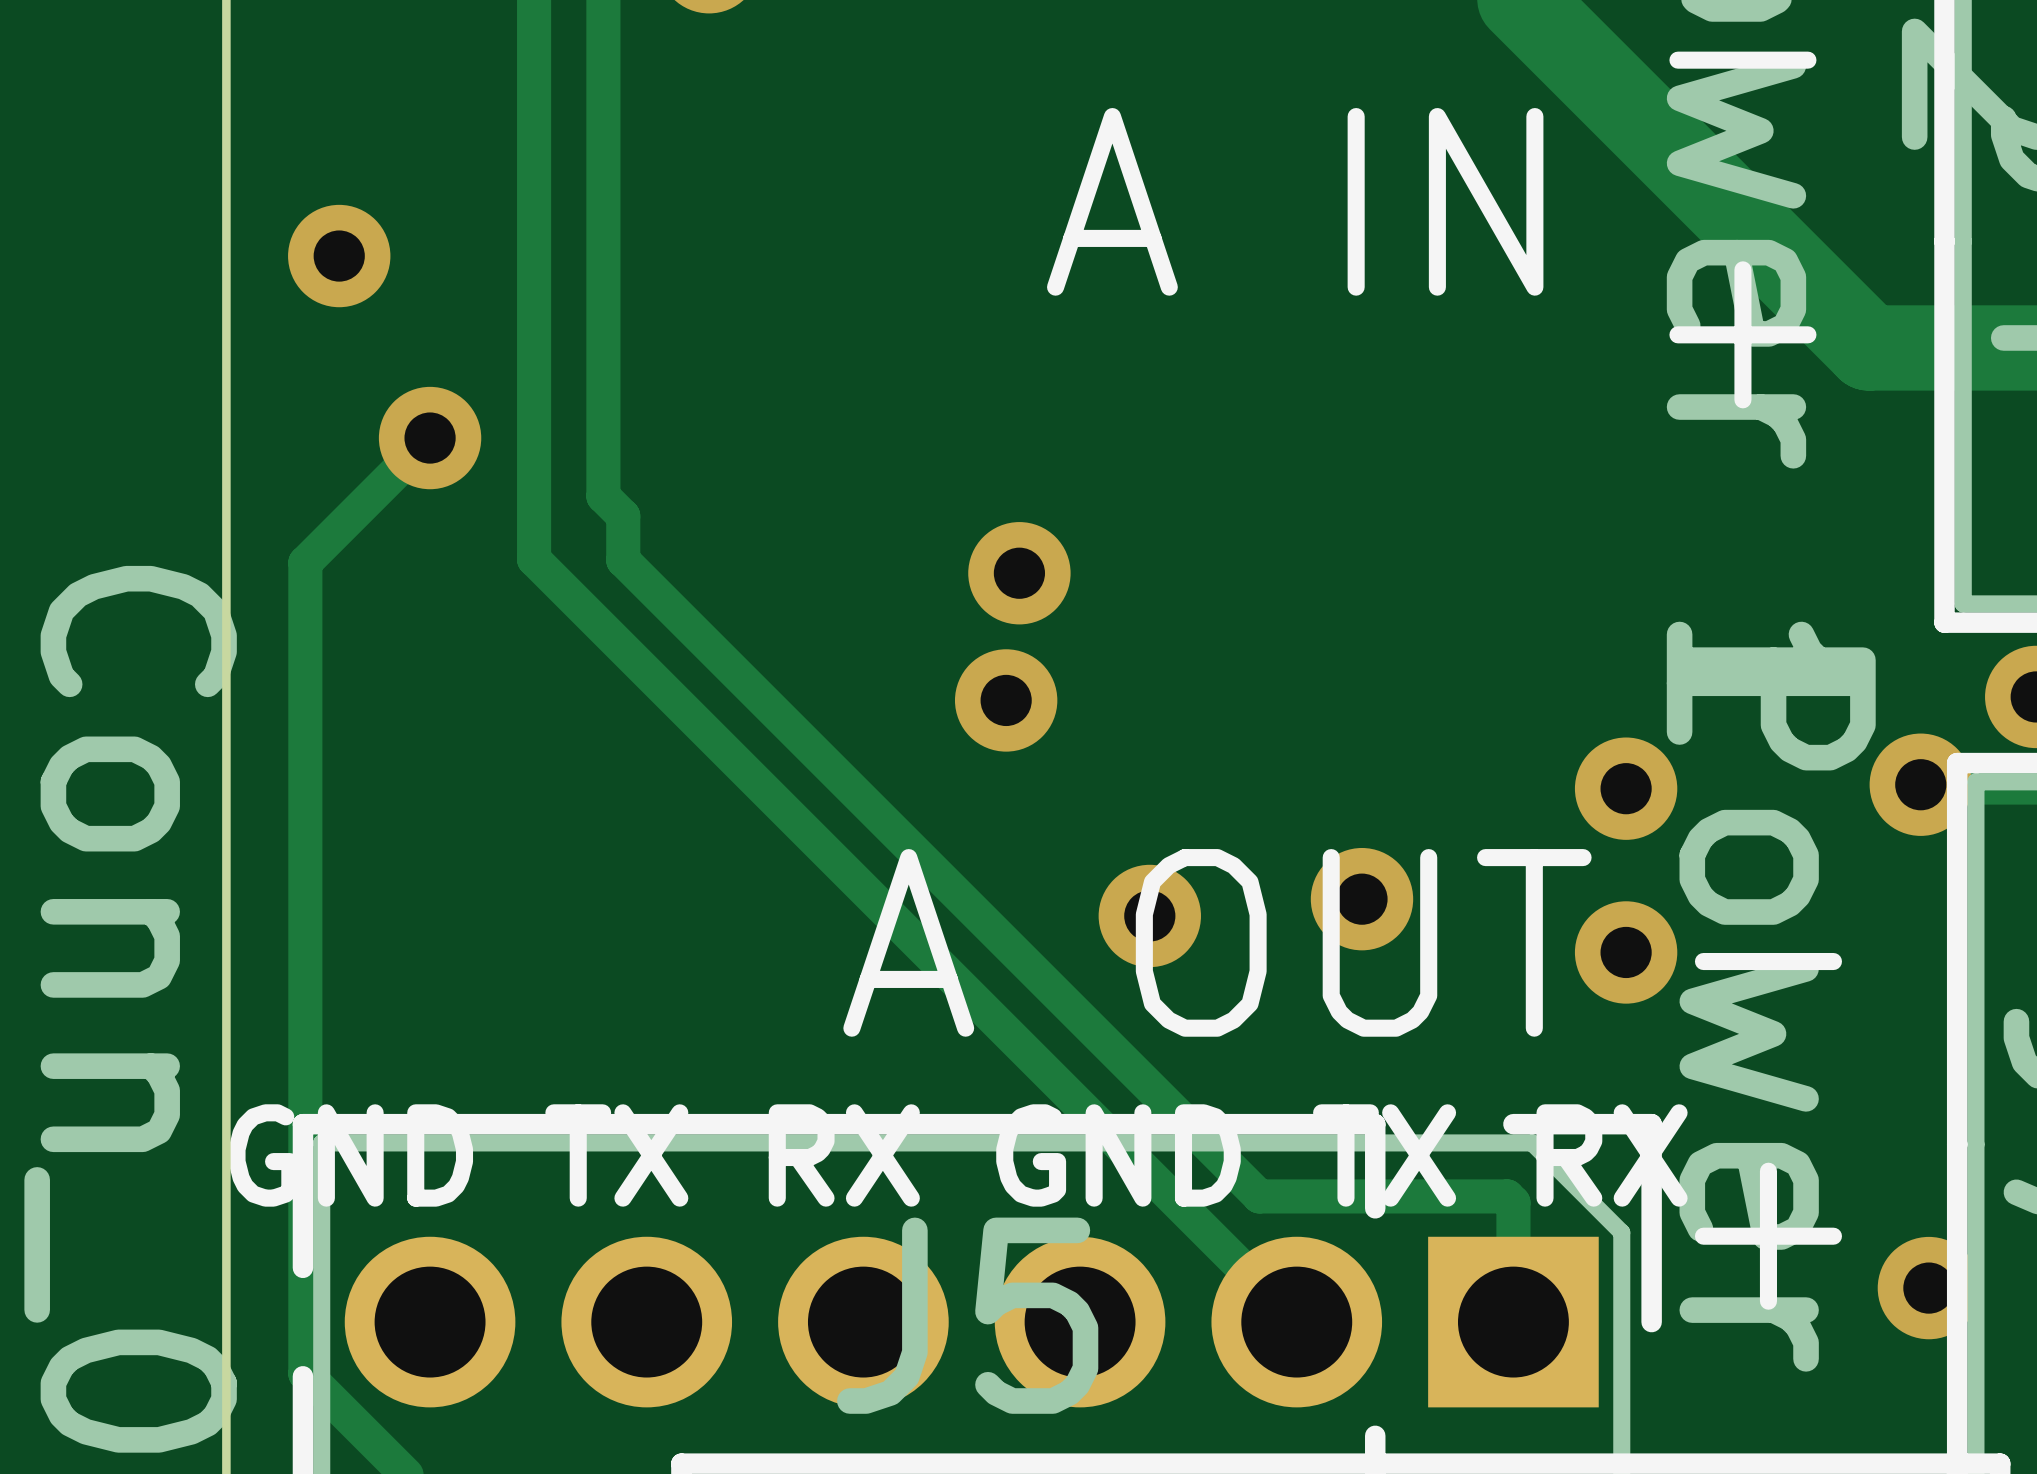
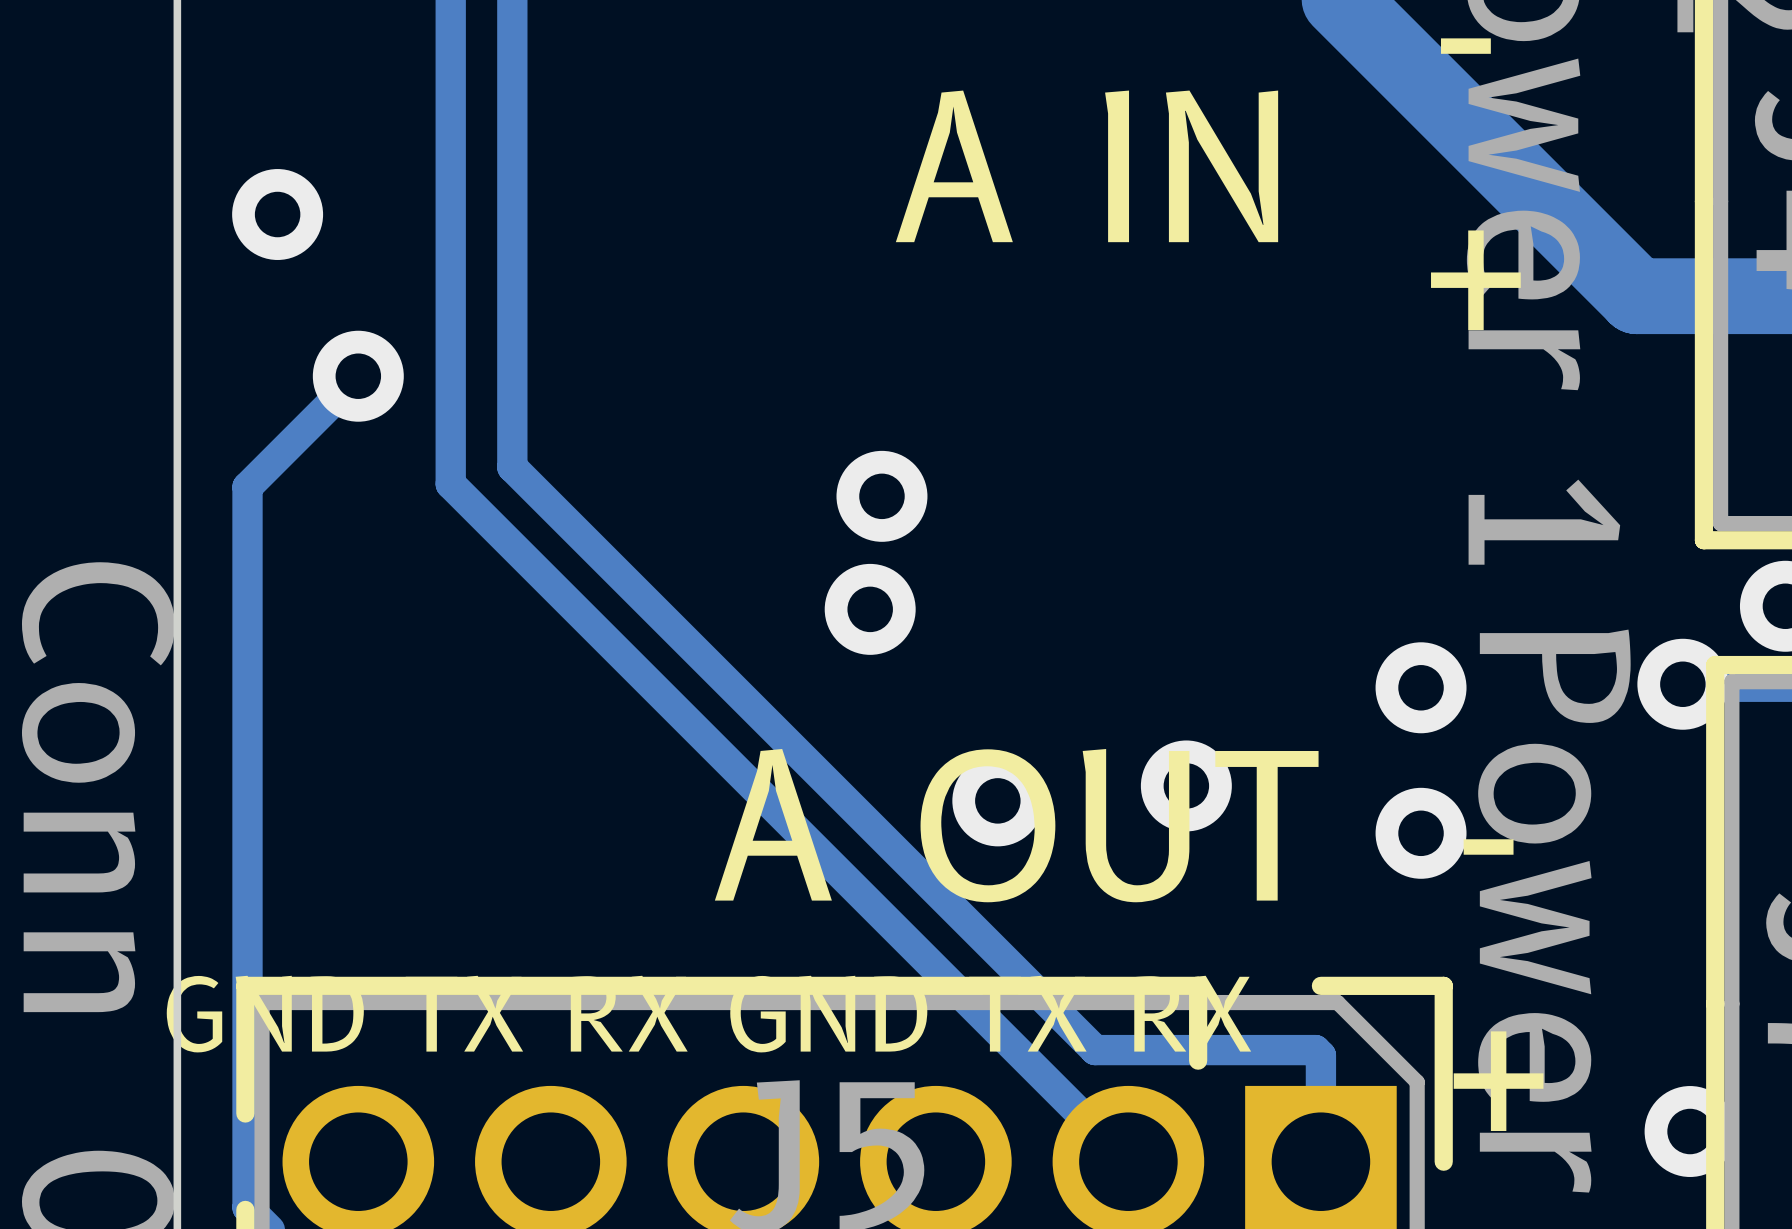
track: (603, 496) (623, 516) (623, 560) -> (512, 427) (512, 467) (529, 484)

